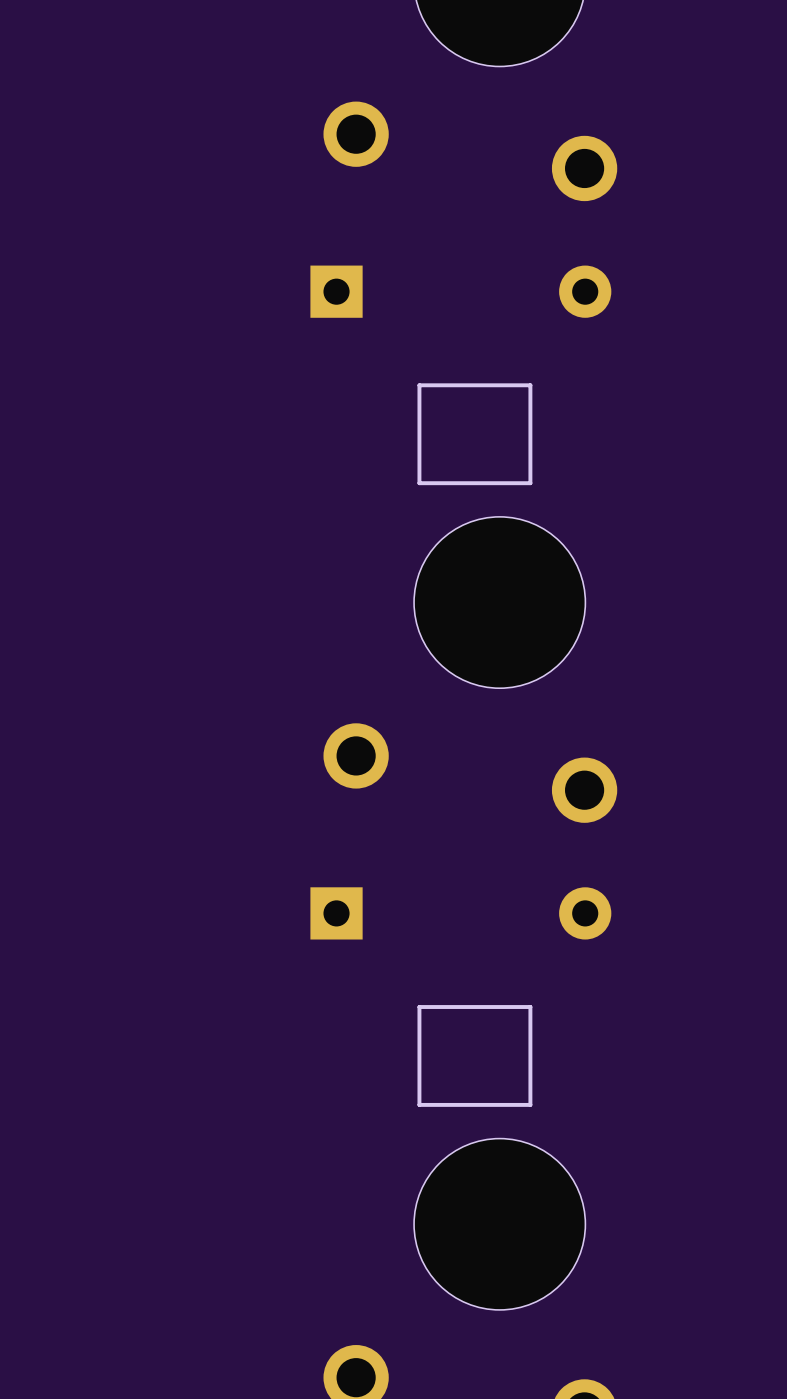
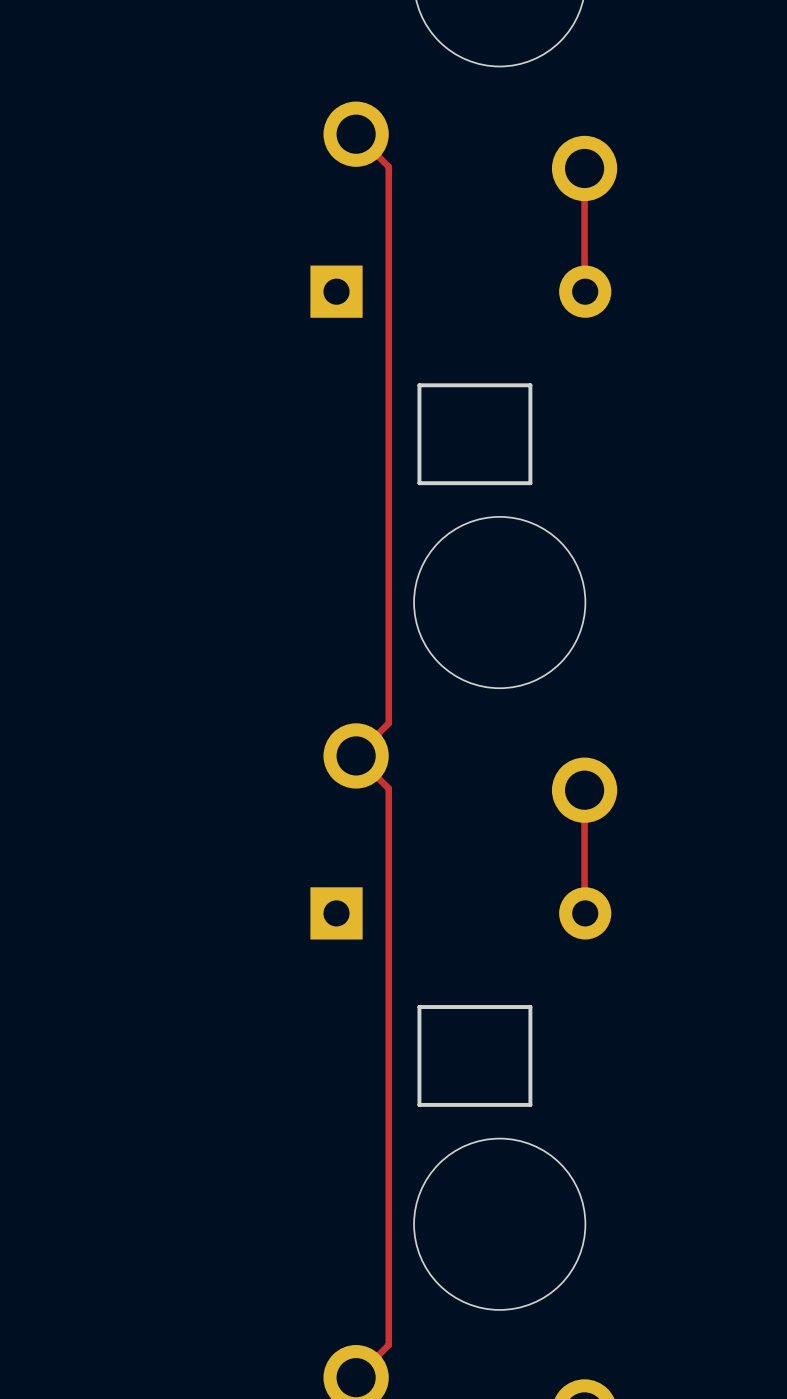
track: none -> (356, 134) (388, 166) (388, 723) (356, 755) (388, 788) (388, 1345) (356, 1377)
track: none -> (584, 168) (585, 291)
track: none -> (584, 790) (585, 913)

